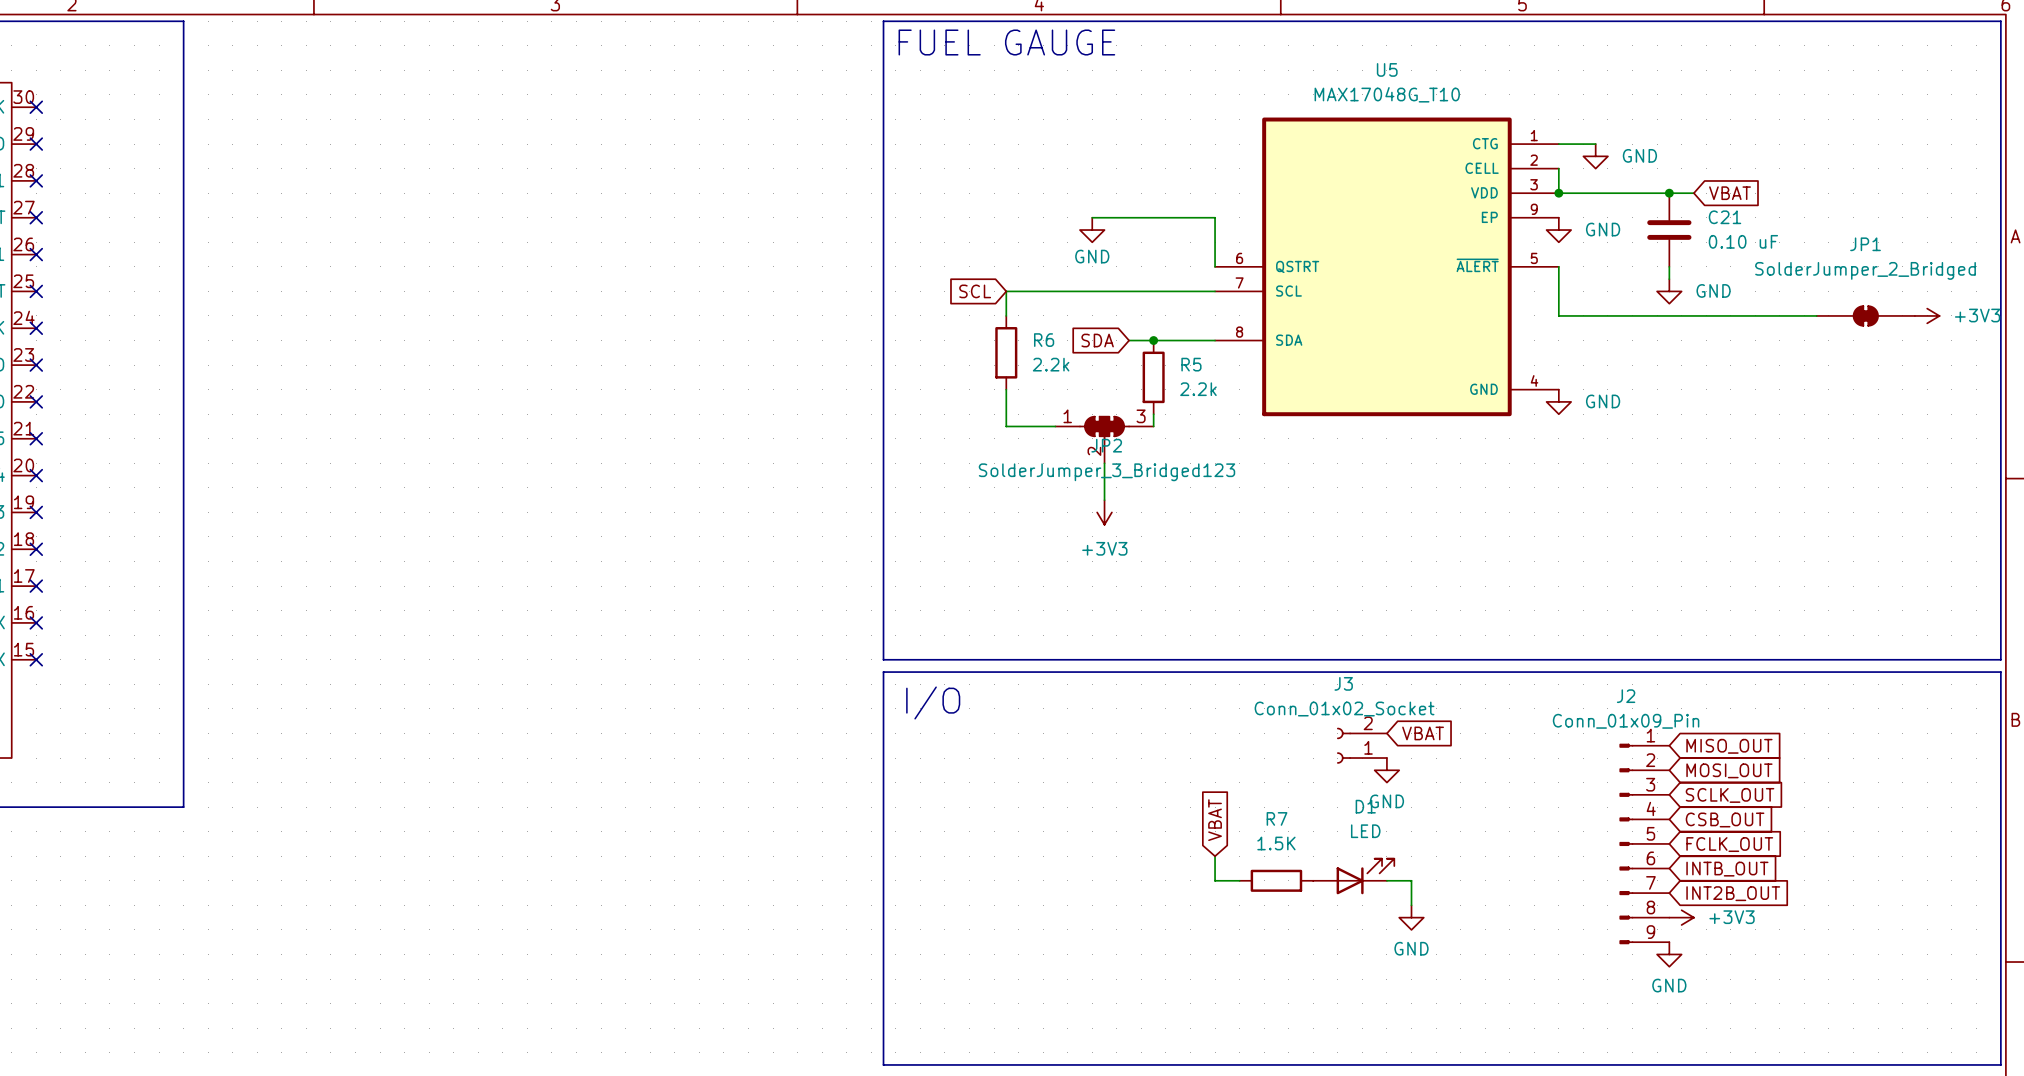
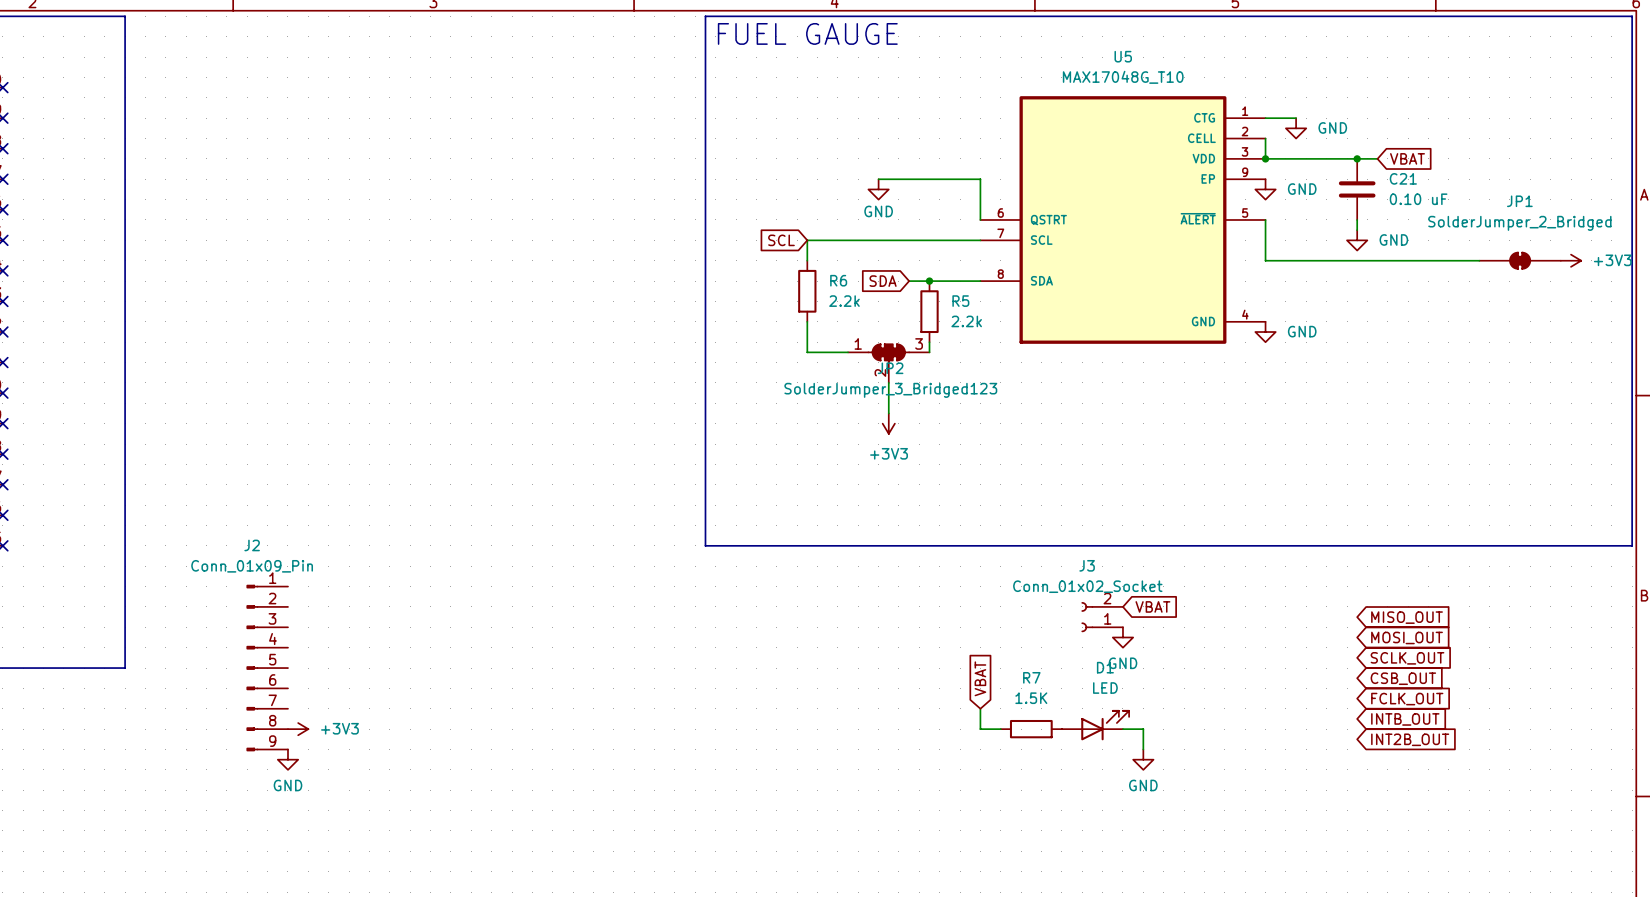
line: (883, 672) (883, 1064) (2000, 1064) (2000, 672) (883, 672) -> none
text: I/O (933, 702) -> none
J2 position: (1644, 843) -> (267, 668)
power symbol: none -> +3V3 (298, 729)
power symbol: none -> GND (287, 759)
power symbol: +3V3 (1681, 917) -> none
power symbol: GND (1669, 954) -> none

